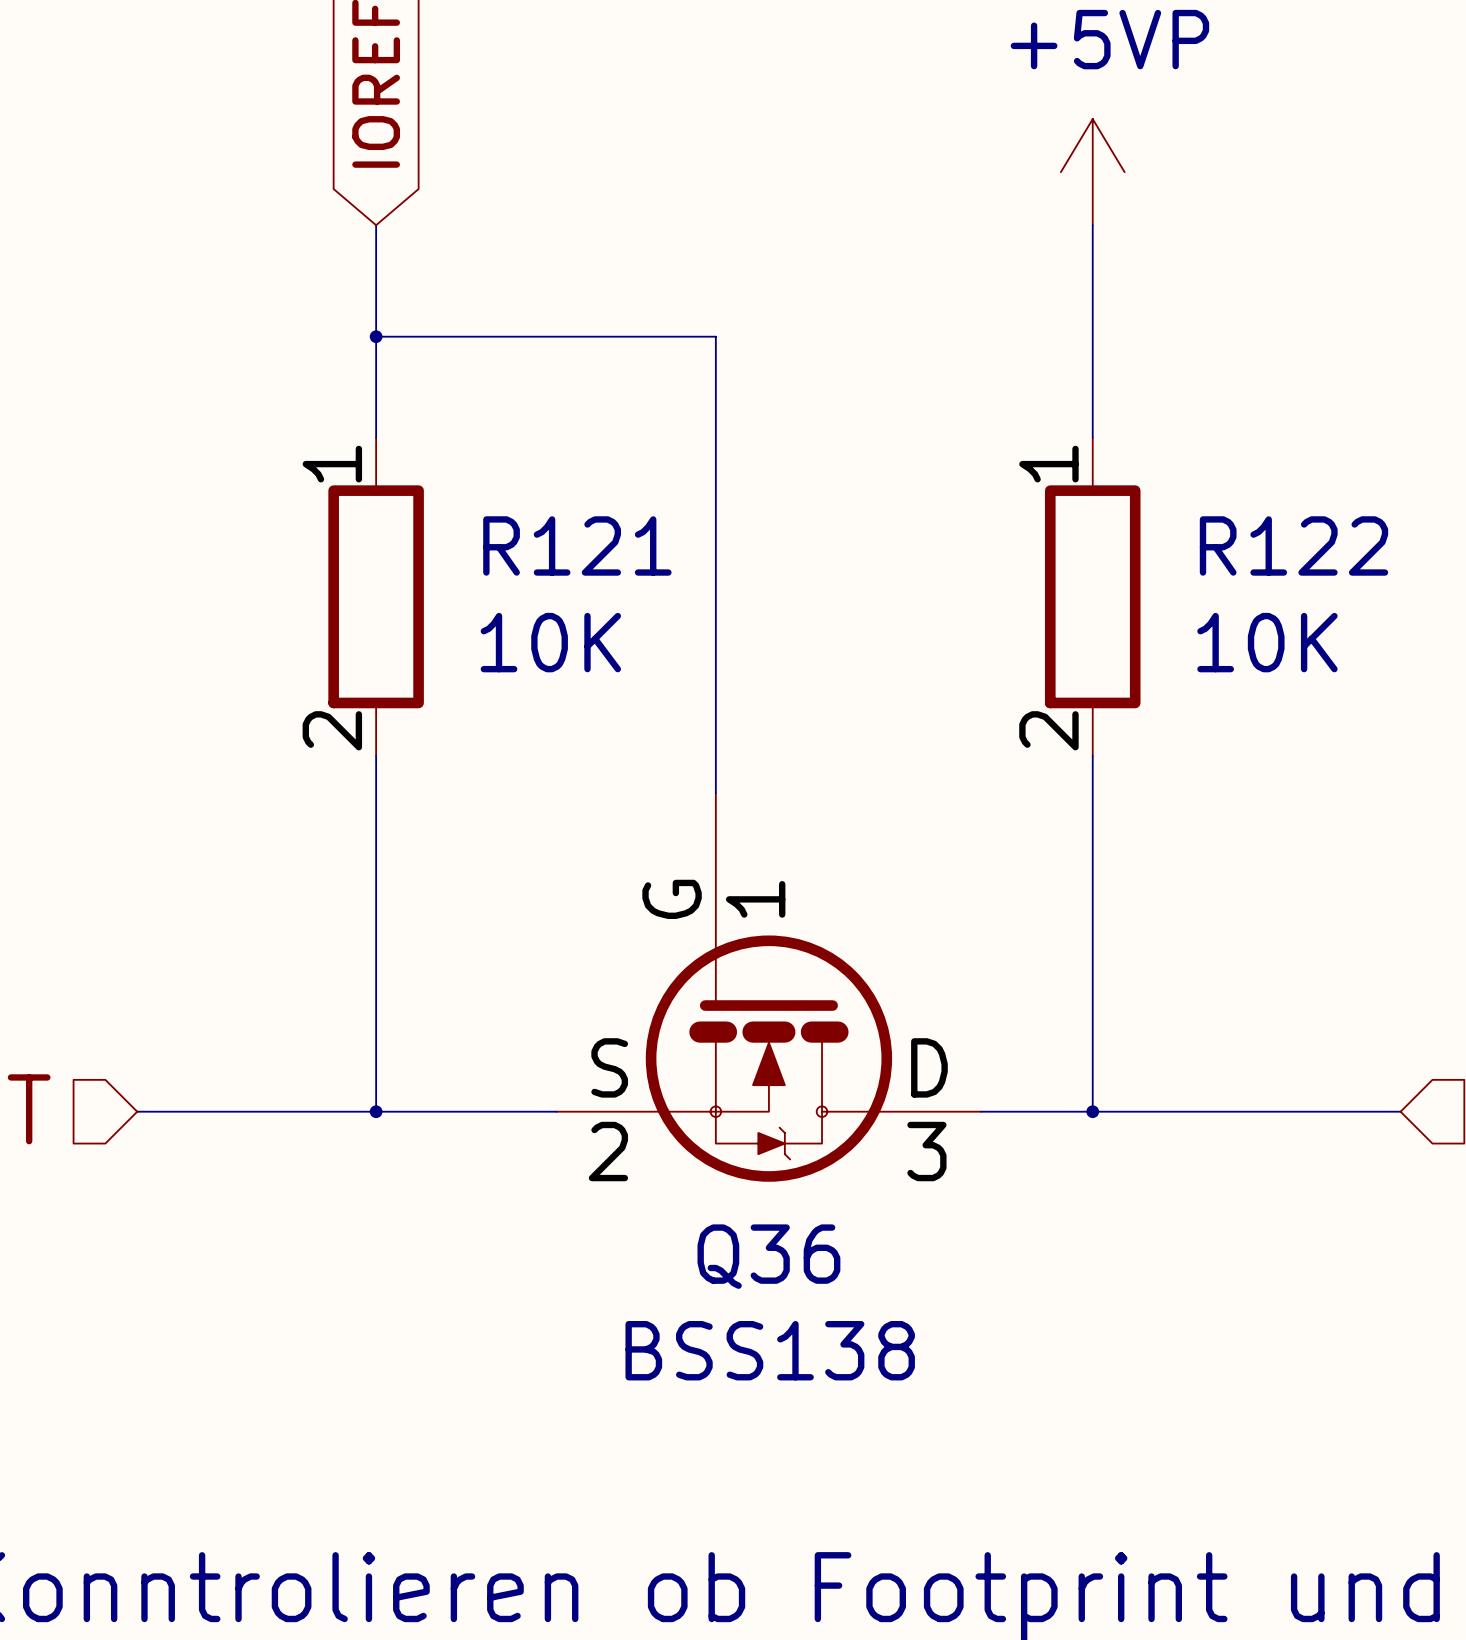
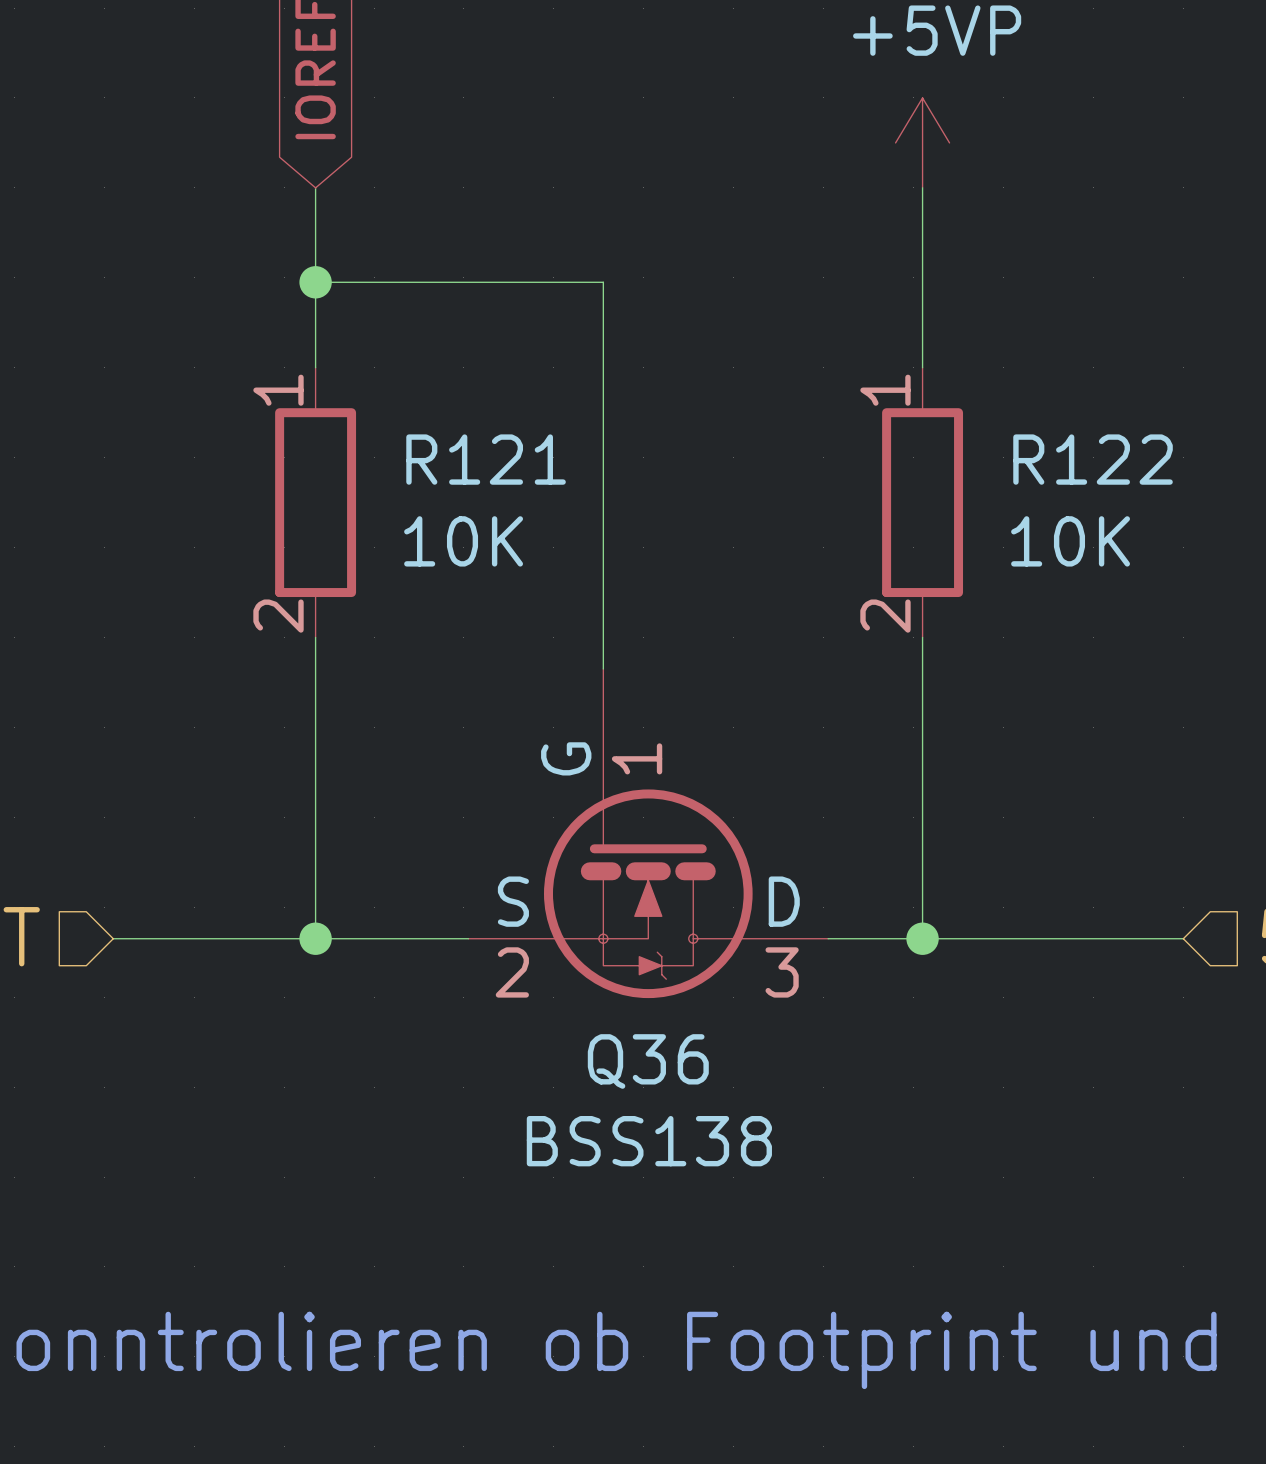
junction size: [369, 330, 383, 344] -> [299, 266, 332, 299]
junction size: [369, 1105, 383, 1119] -> [299, 922, 332, 955]
junction size: [1086, 1105, 1100, 1119] -> [906, 922, 939, 955]

